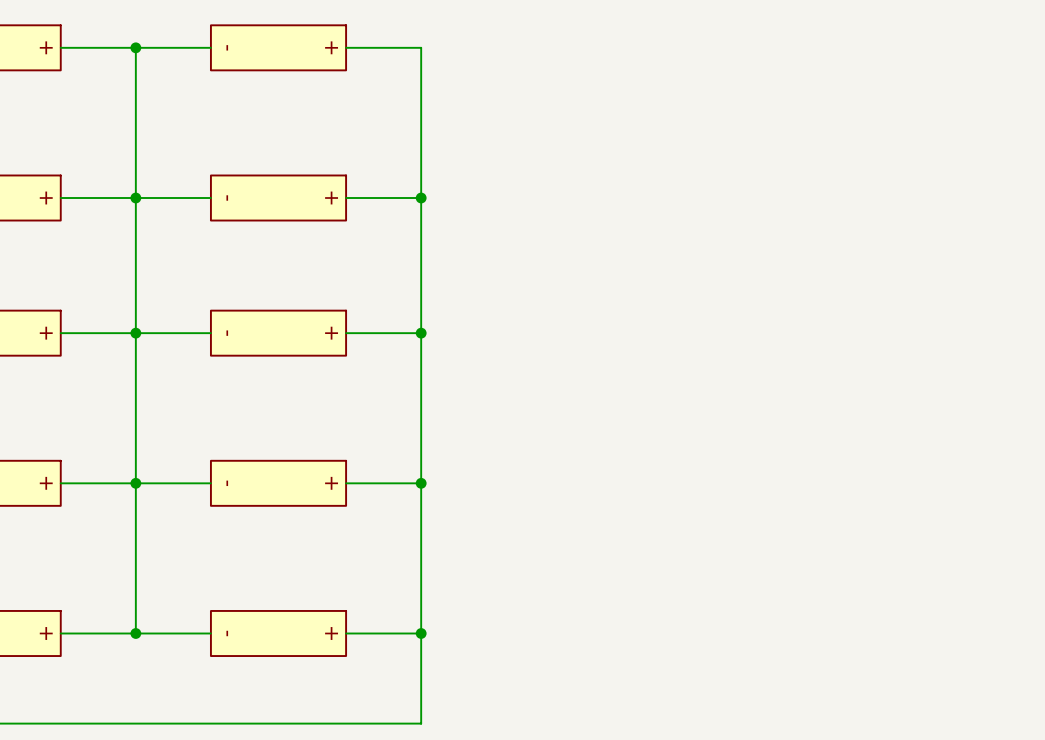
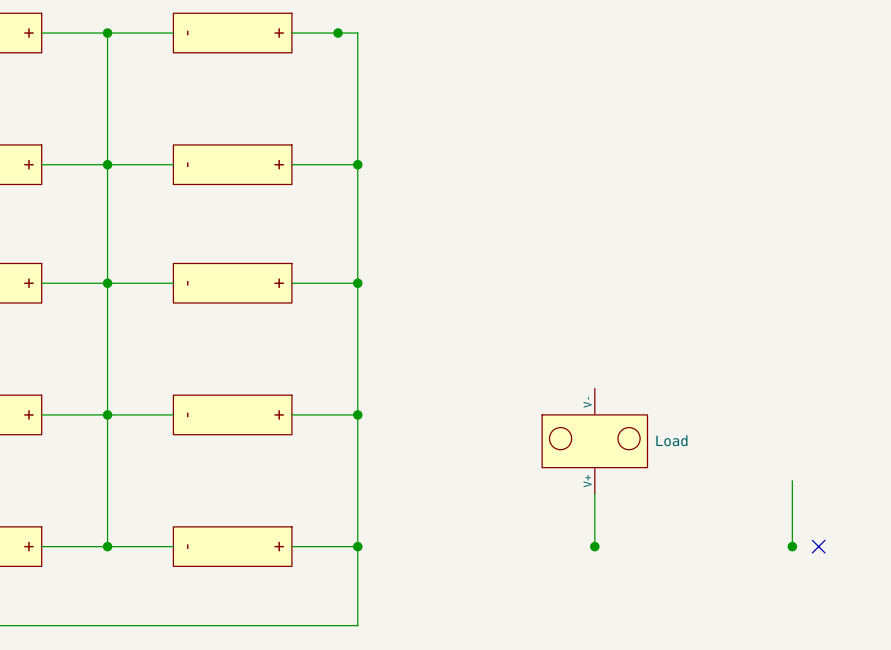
junction: none -> (338, 33)
power symbol: none -> Load (594, 441)
wire: none -> (792, 480) (792, 546)
wire: none -> (594, 493) (594, 546)
junction: none -> (594, 546)
junction: none -> (792, 546)
no-connect mark: none -> (818, 546)

